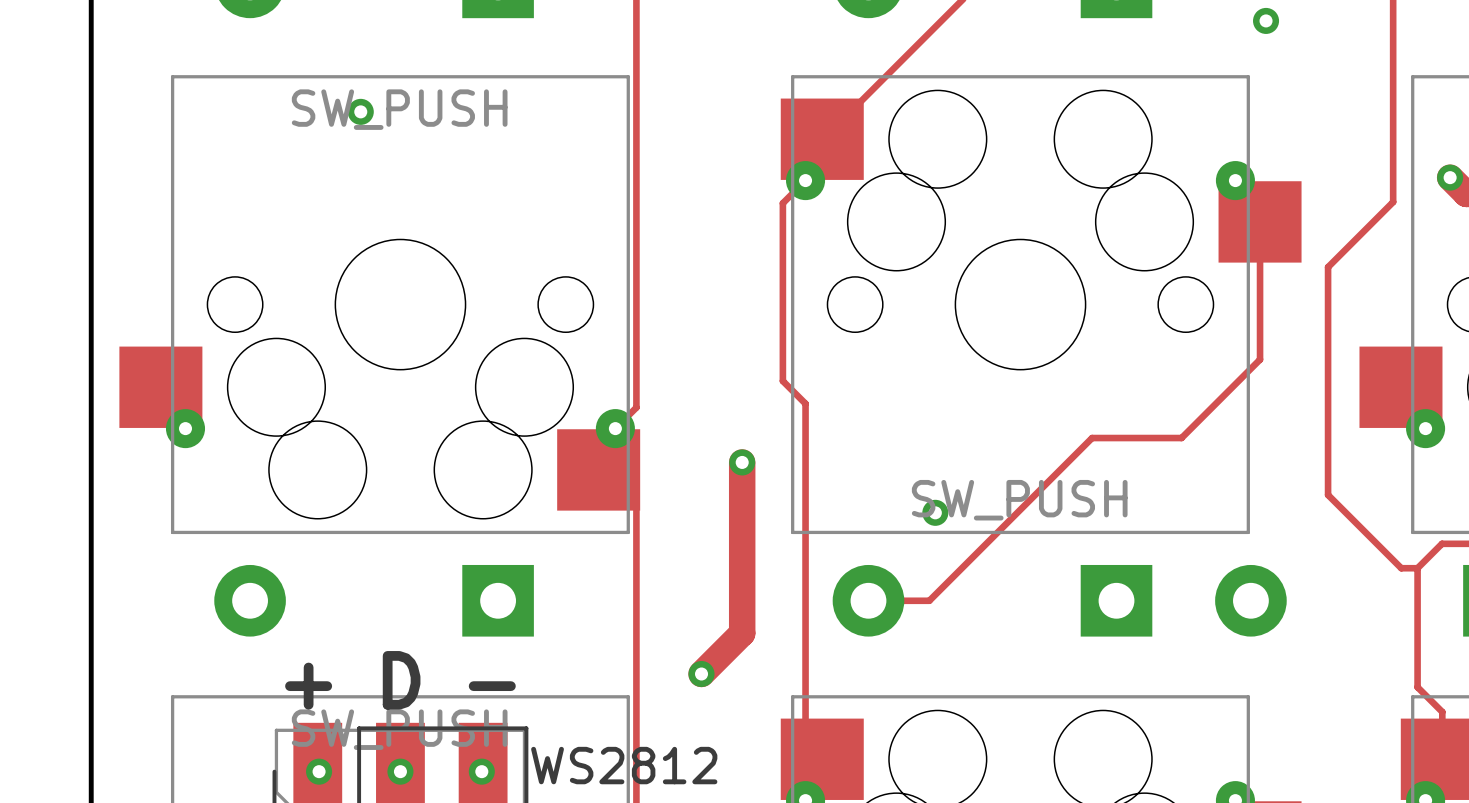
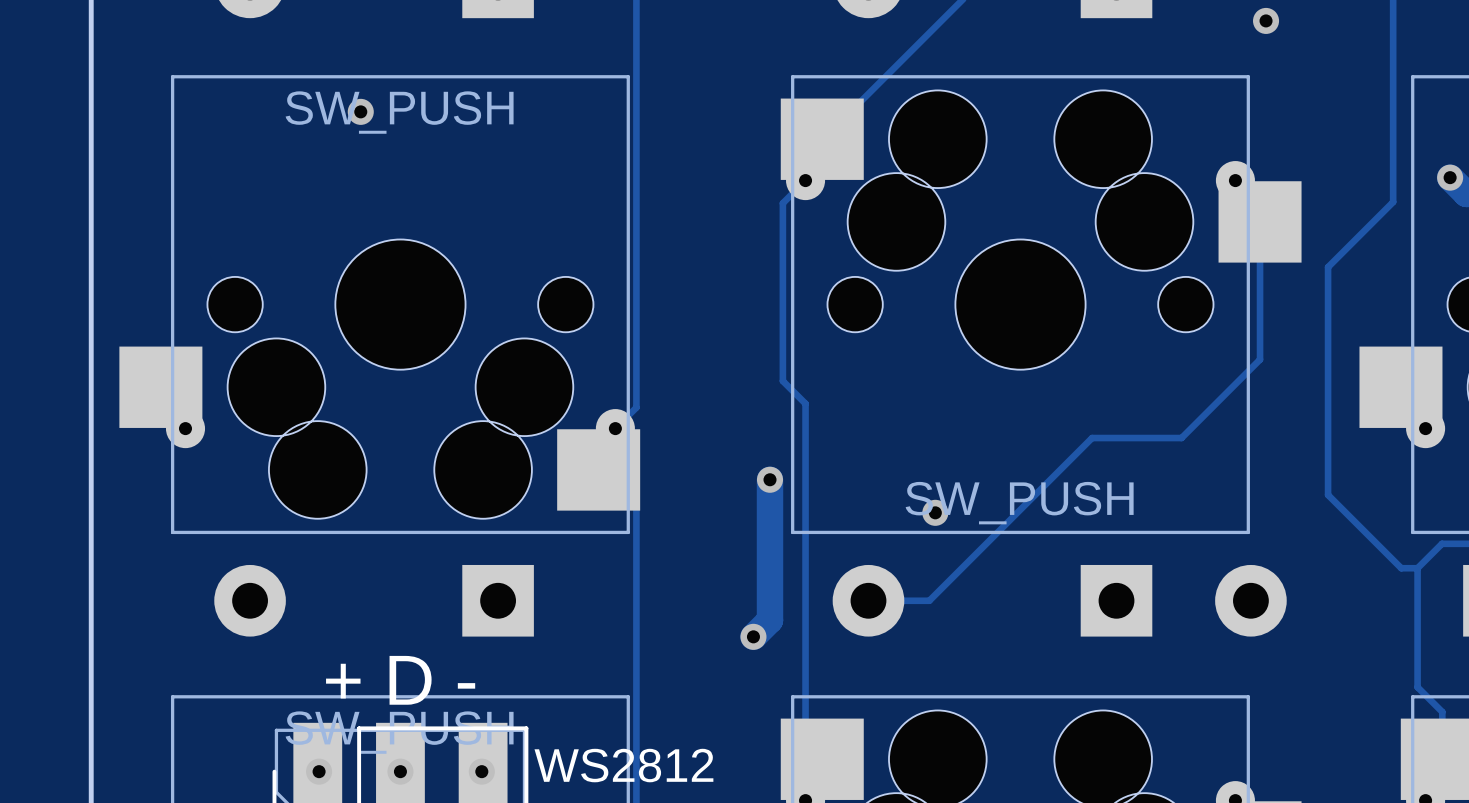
track: (742, 462) (742, 633) (701, 674) -> none
via position: (742, 462) -> (770, 479)
track: none -> (770, 479) (770, 620) (753, 636)
via position: (701, 674) -> (753, 636)

